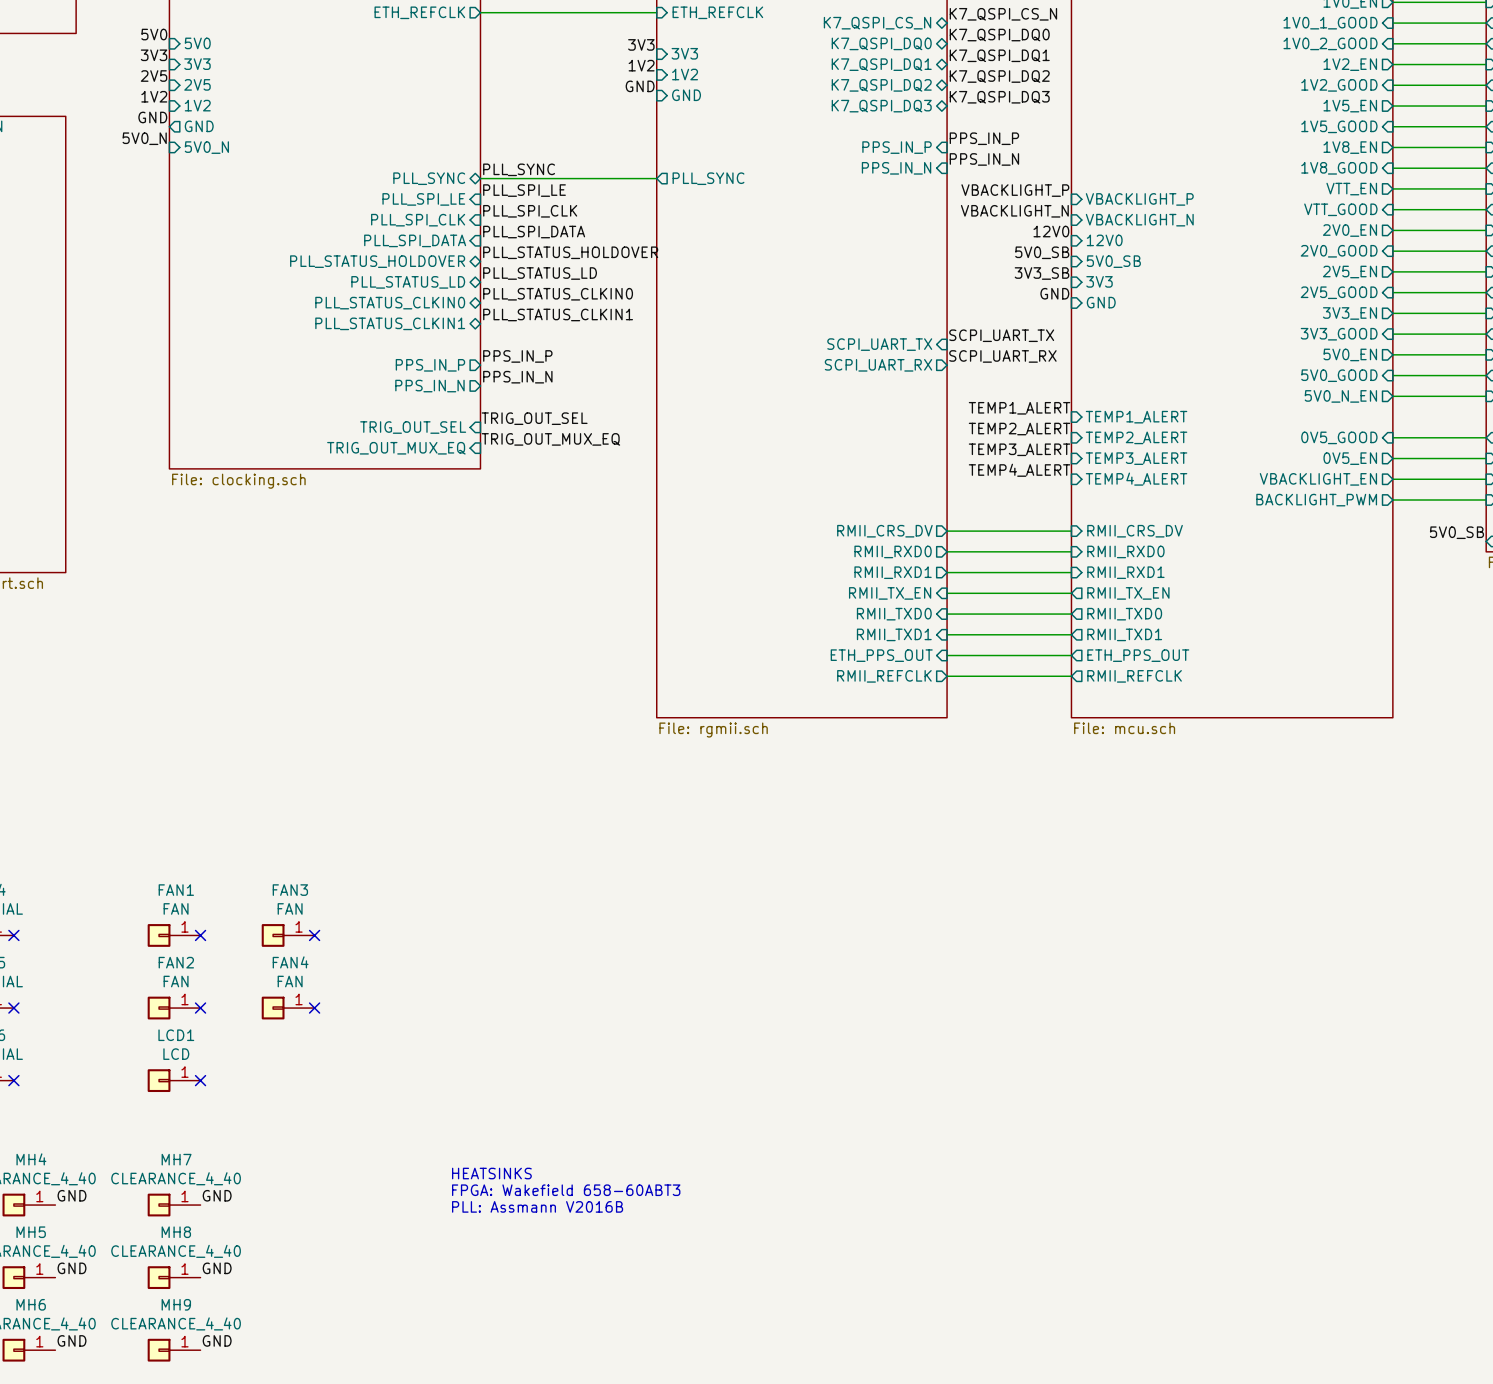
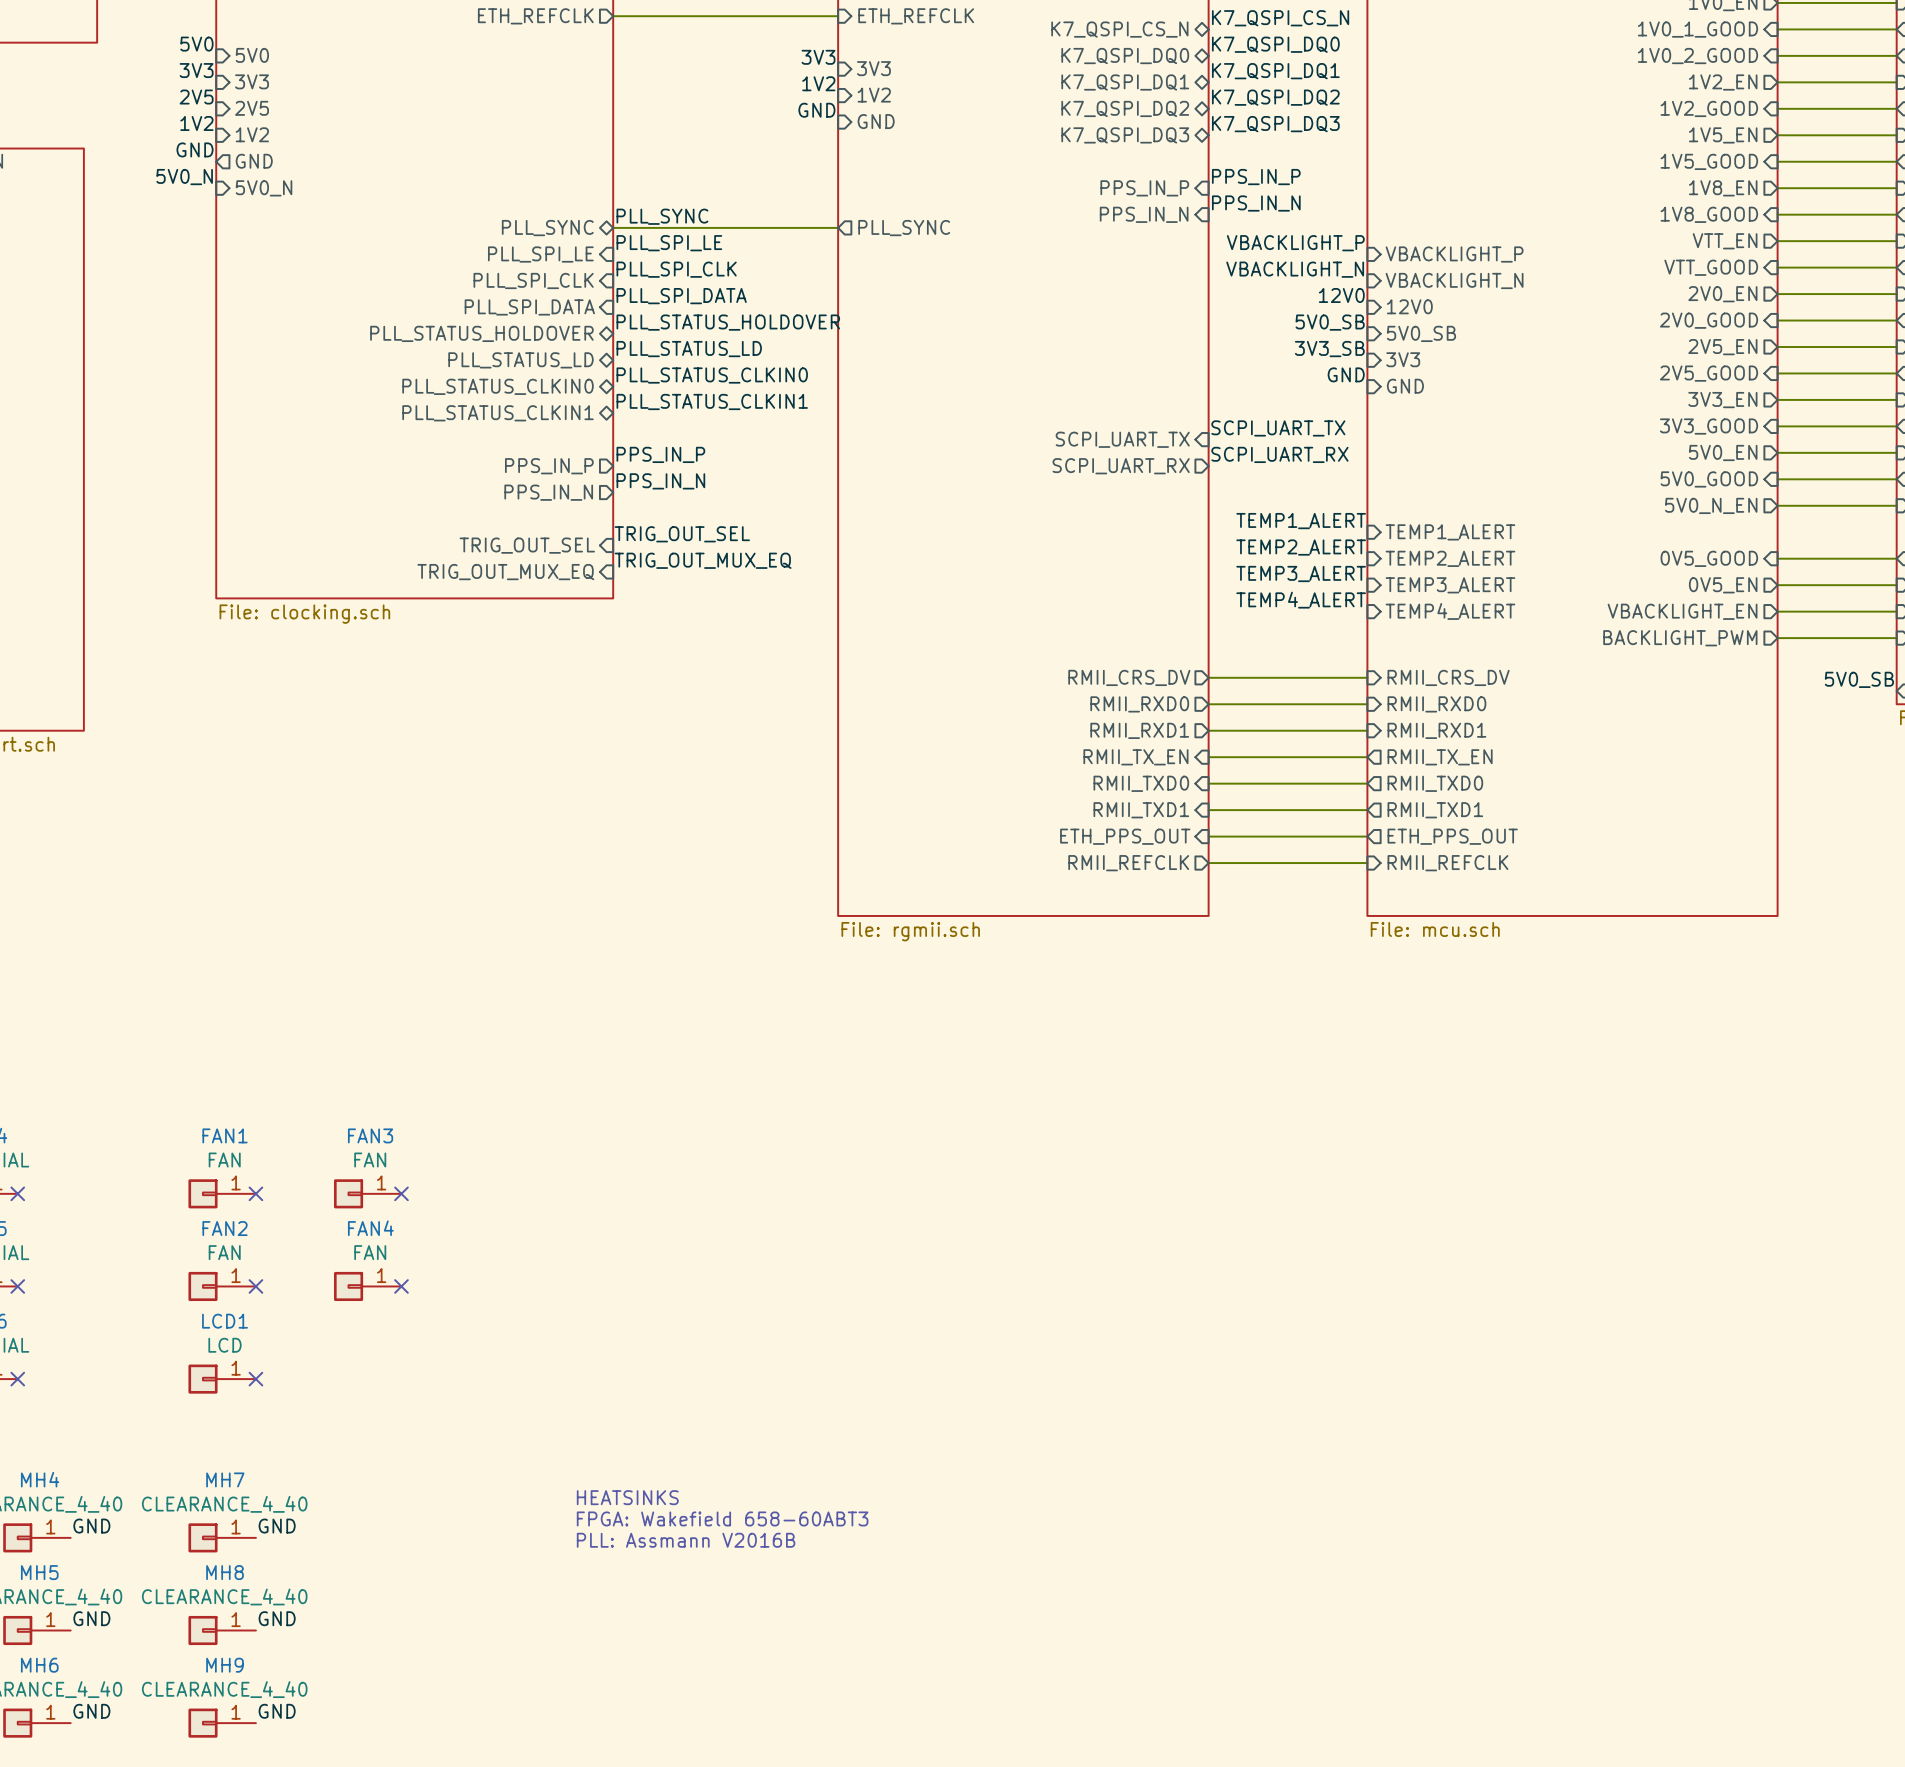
sheet pin shape: output (1134, 676) -> input (1447, 863)

